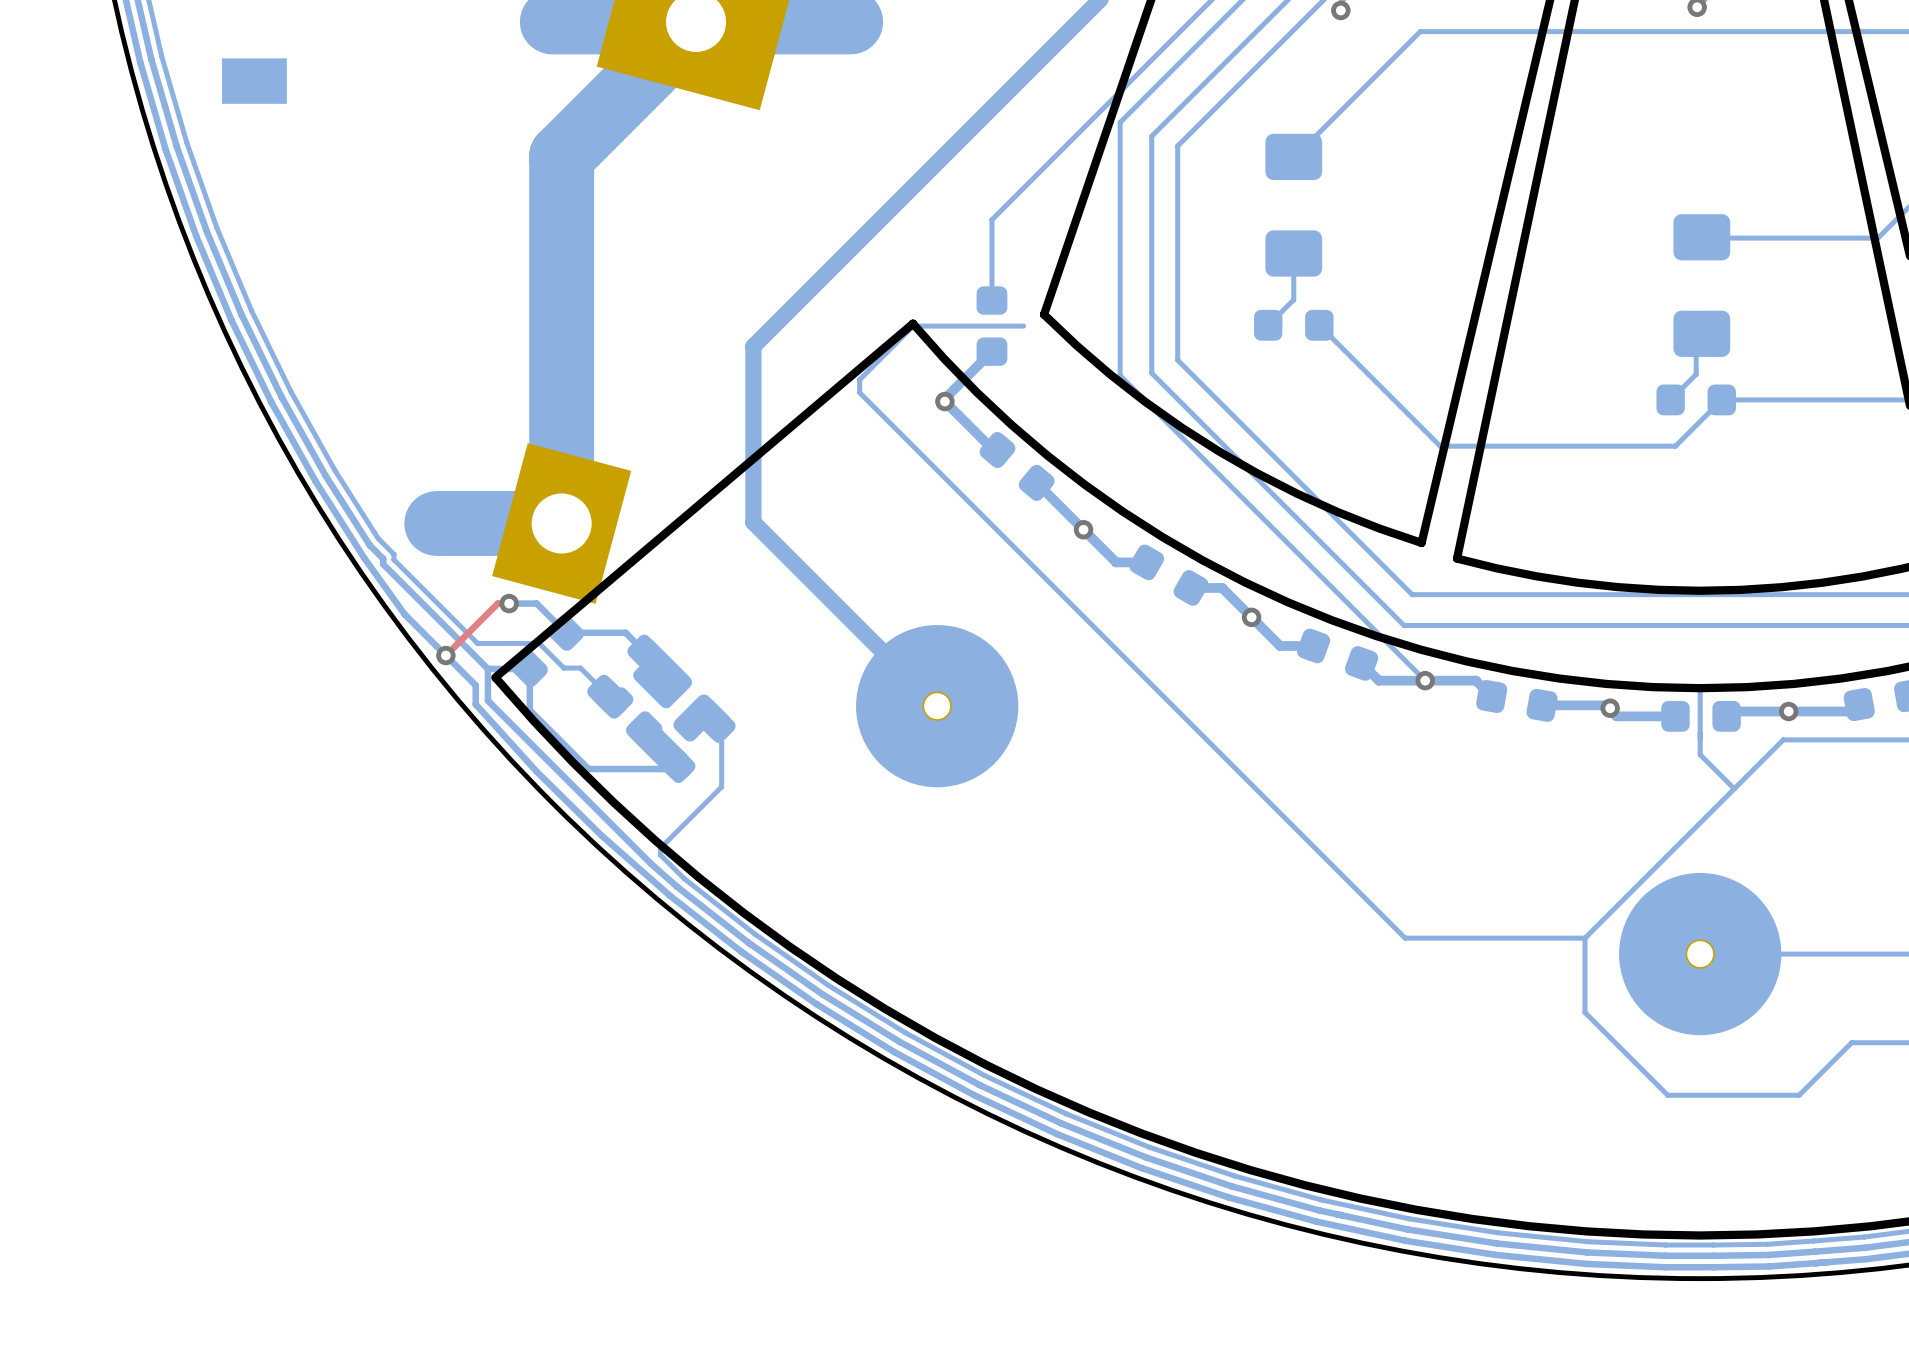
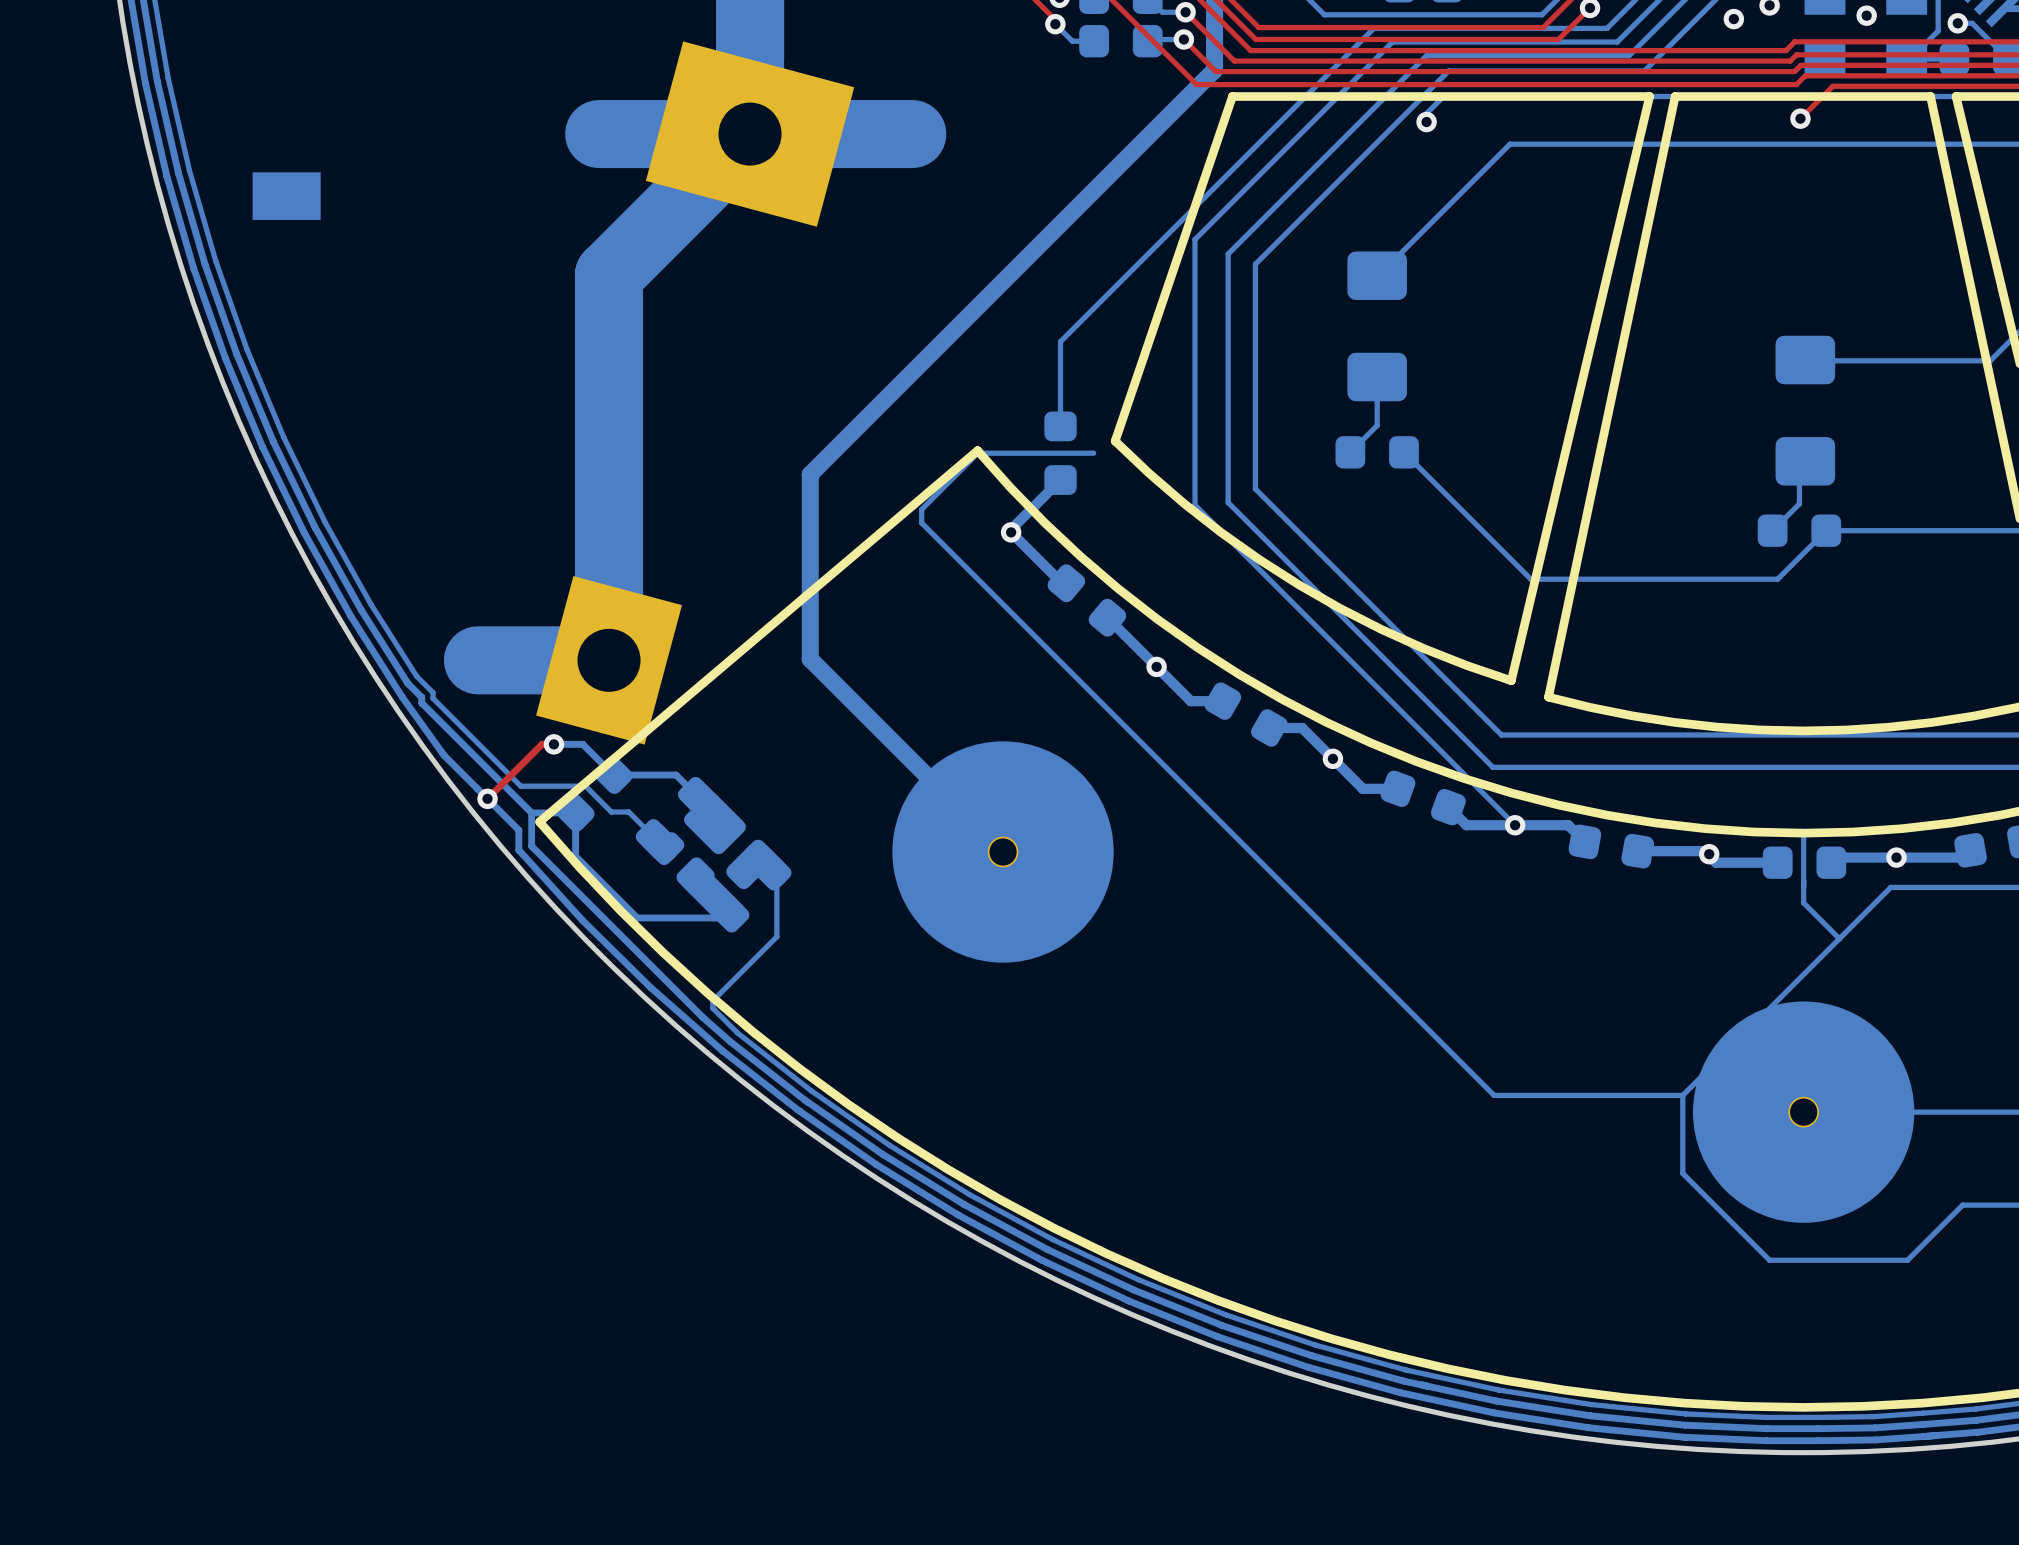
part footprint: [856, 625, 1019, 788] -> [892, 741, 1114, 963]
part footprint: [1619, 872, 1782, 1036] -> [1692, 1001, 1915, 1223]

